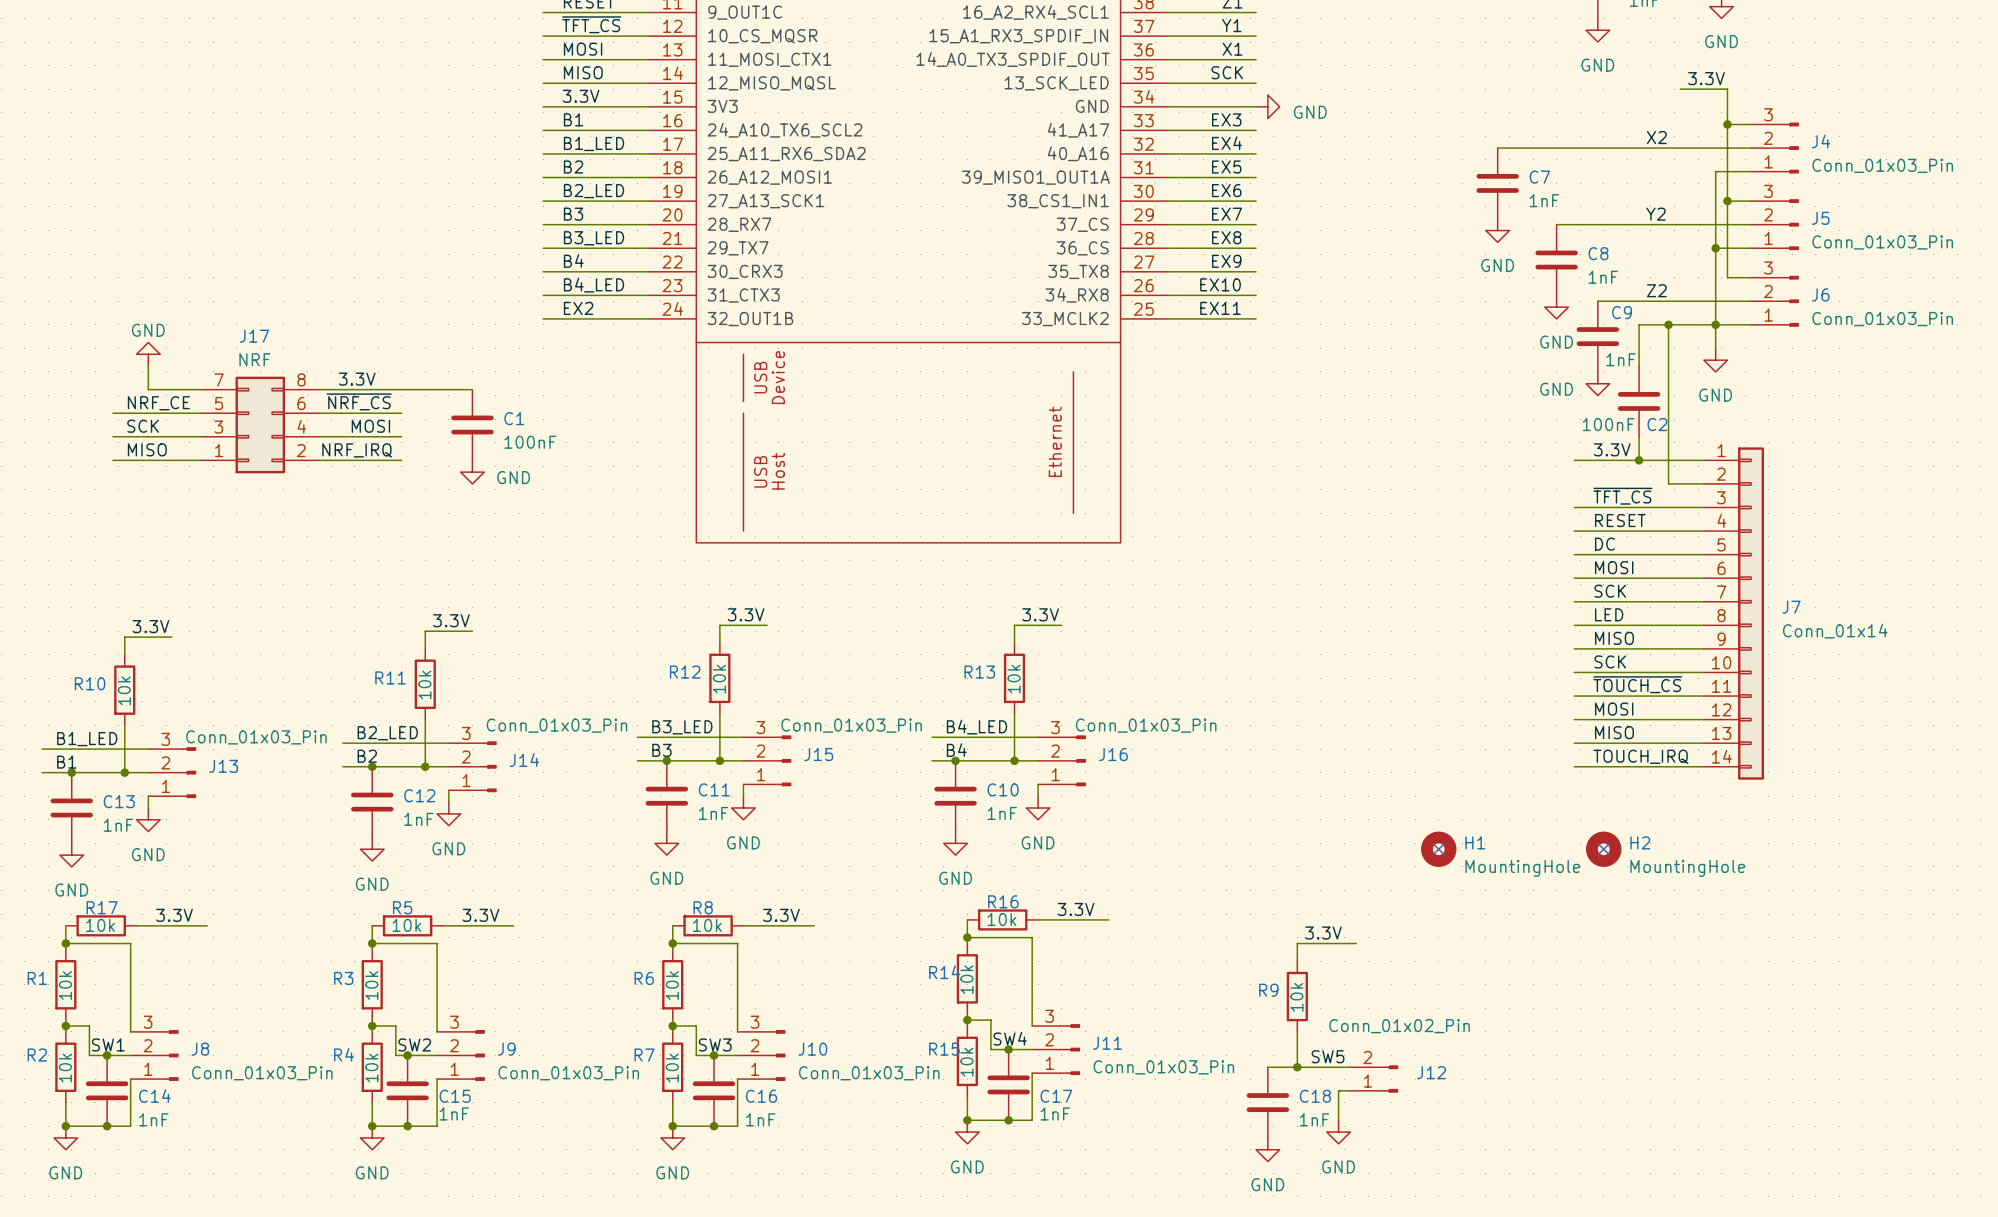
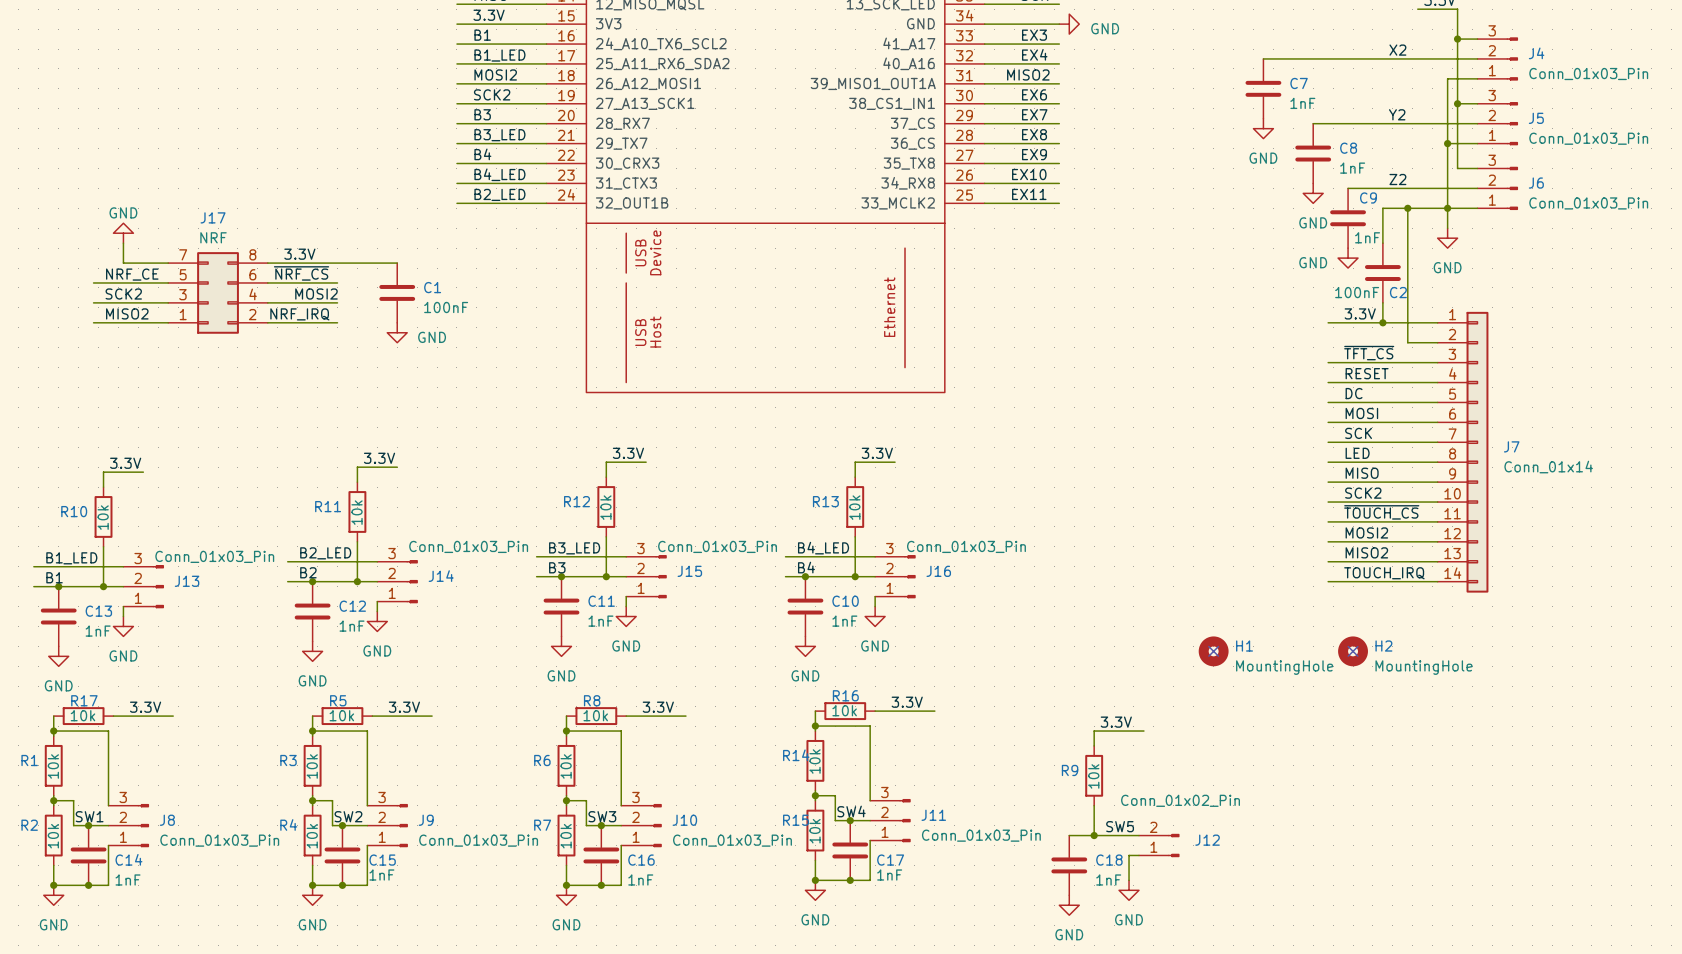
label: B2 (573, 167) -> MOSI2 (495, 74)
label: none -> MISO2 (1028, 74)
label: EX5 (1226, 167) -> none
label: B2_LED (593, 191) -> SCK2 (492, 94)
label: EX2 (578, 308) -> B2_LED (499, 194)
label: SCK (143, 426) -> SCK2 (123, 294)
label: MOSI (370, 426) -> MOSI2 (316, 294)
label: MISO (147, 449) -> MISO2 (127, 313)
label: SCK (1610, 661) -> SCK2 (1363, 493)
label: MOSI (1614, 709) -> MOSI2 (1366, 532)
label: MISO (1614, 732) -> MISO2 (1366, 552)

